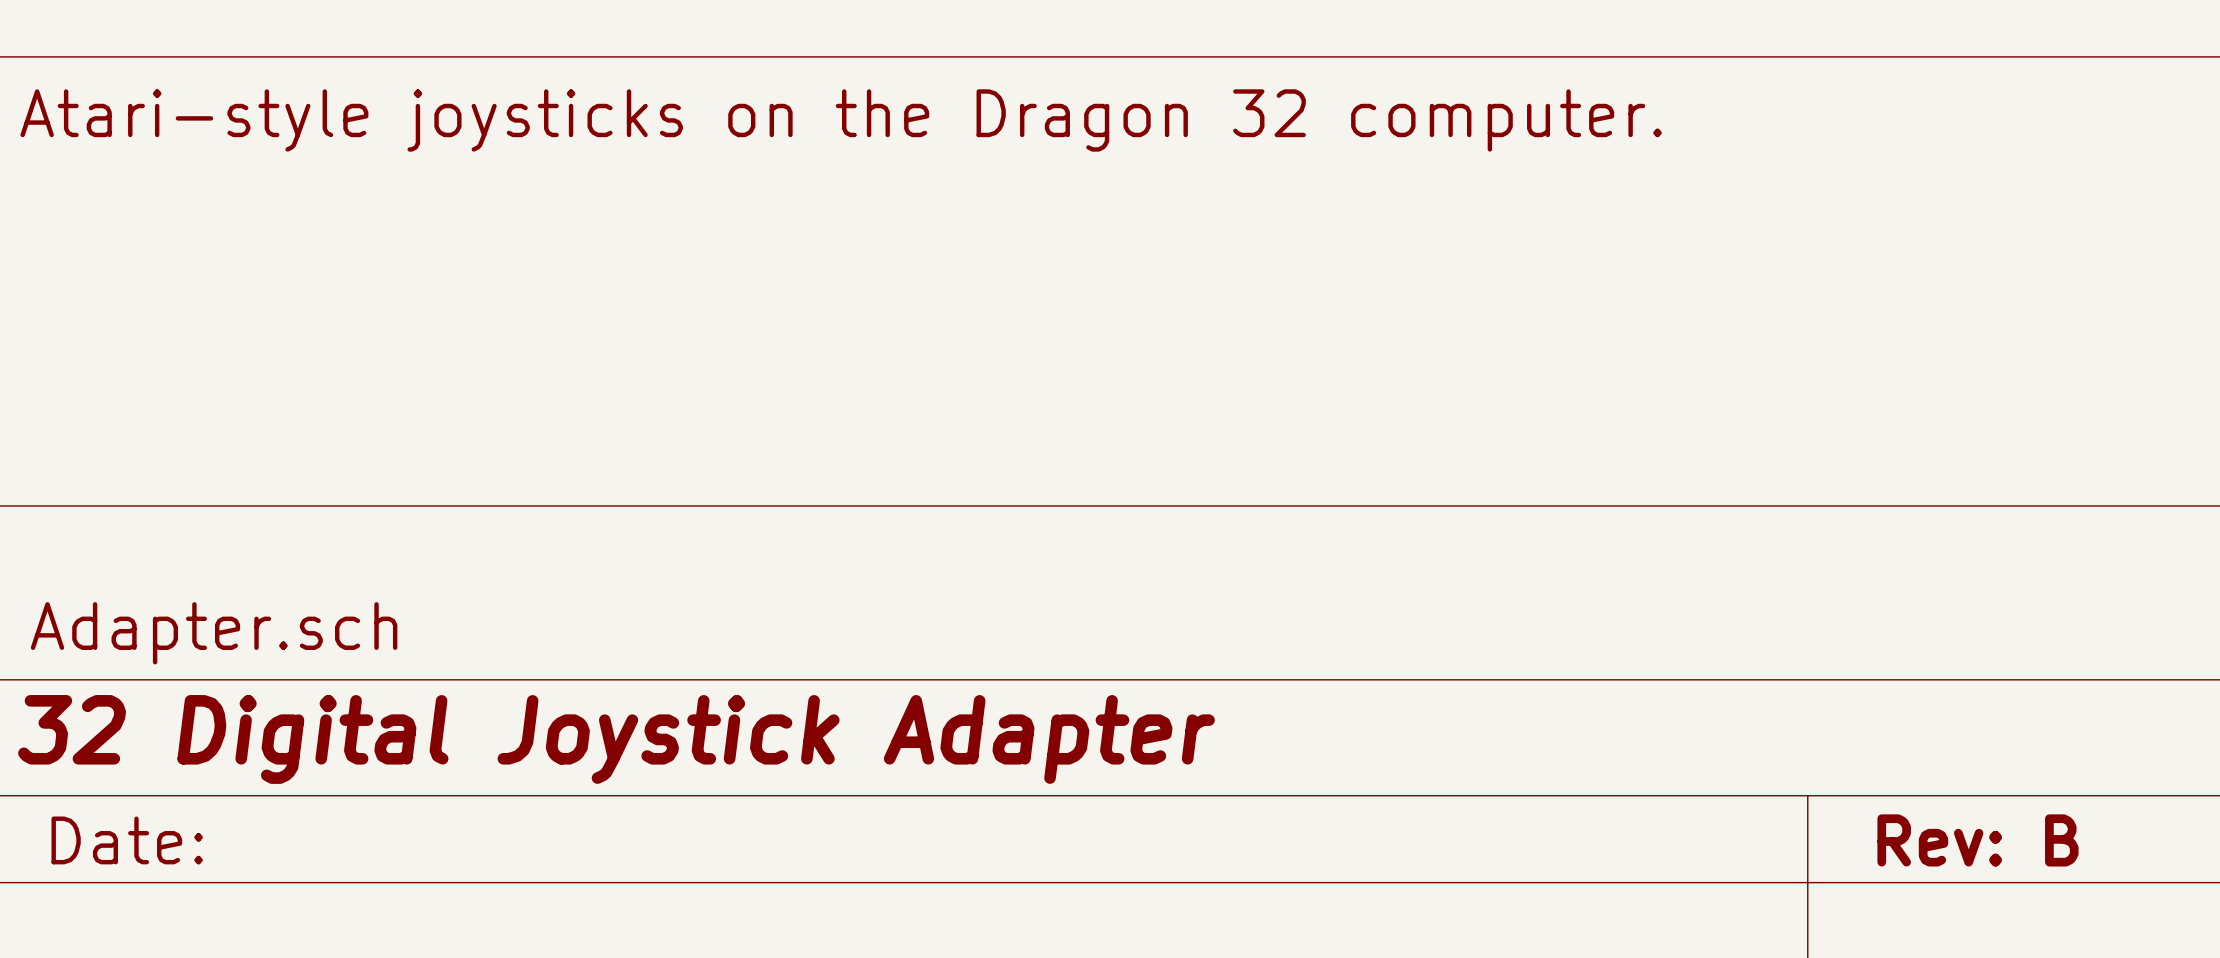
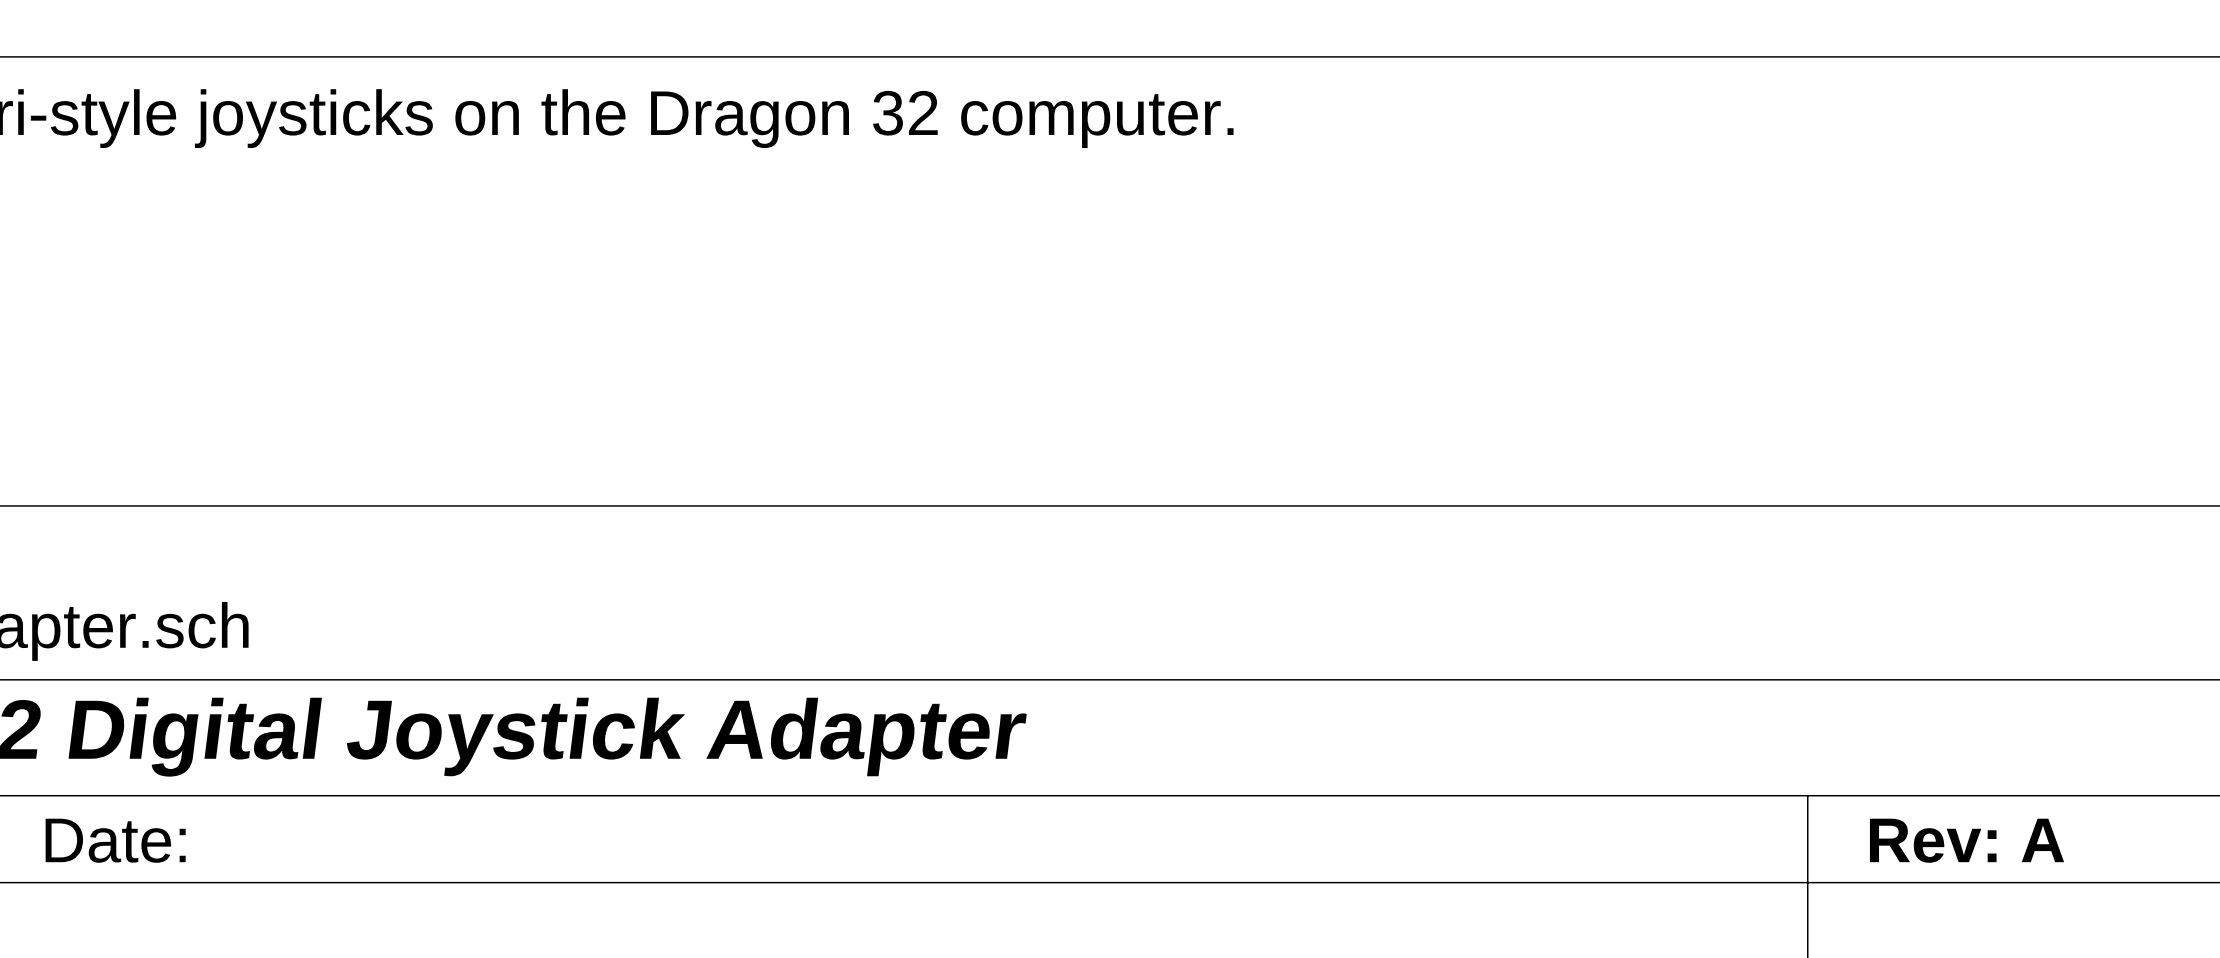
title block: Rev: B (1977, 840) -> Rev: A (1967, 840)

